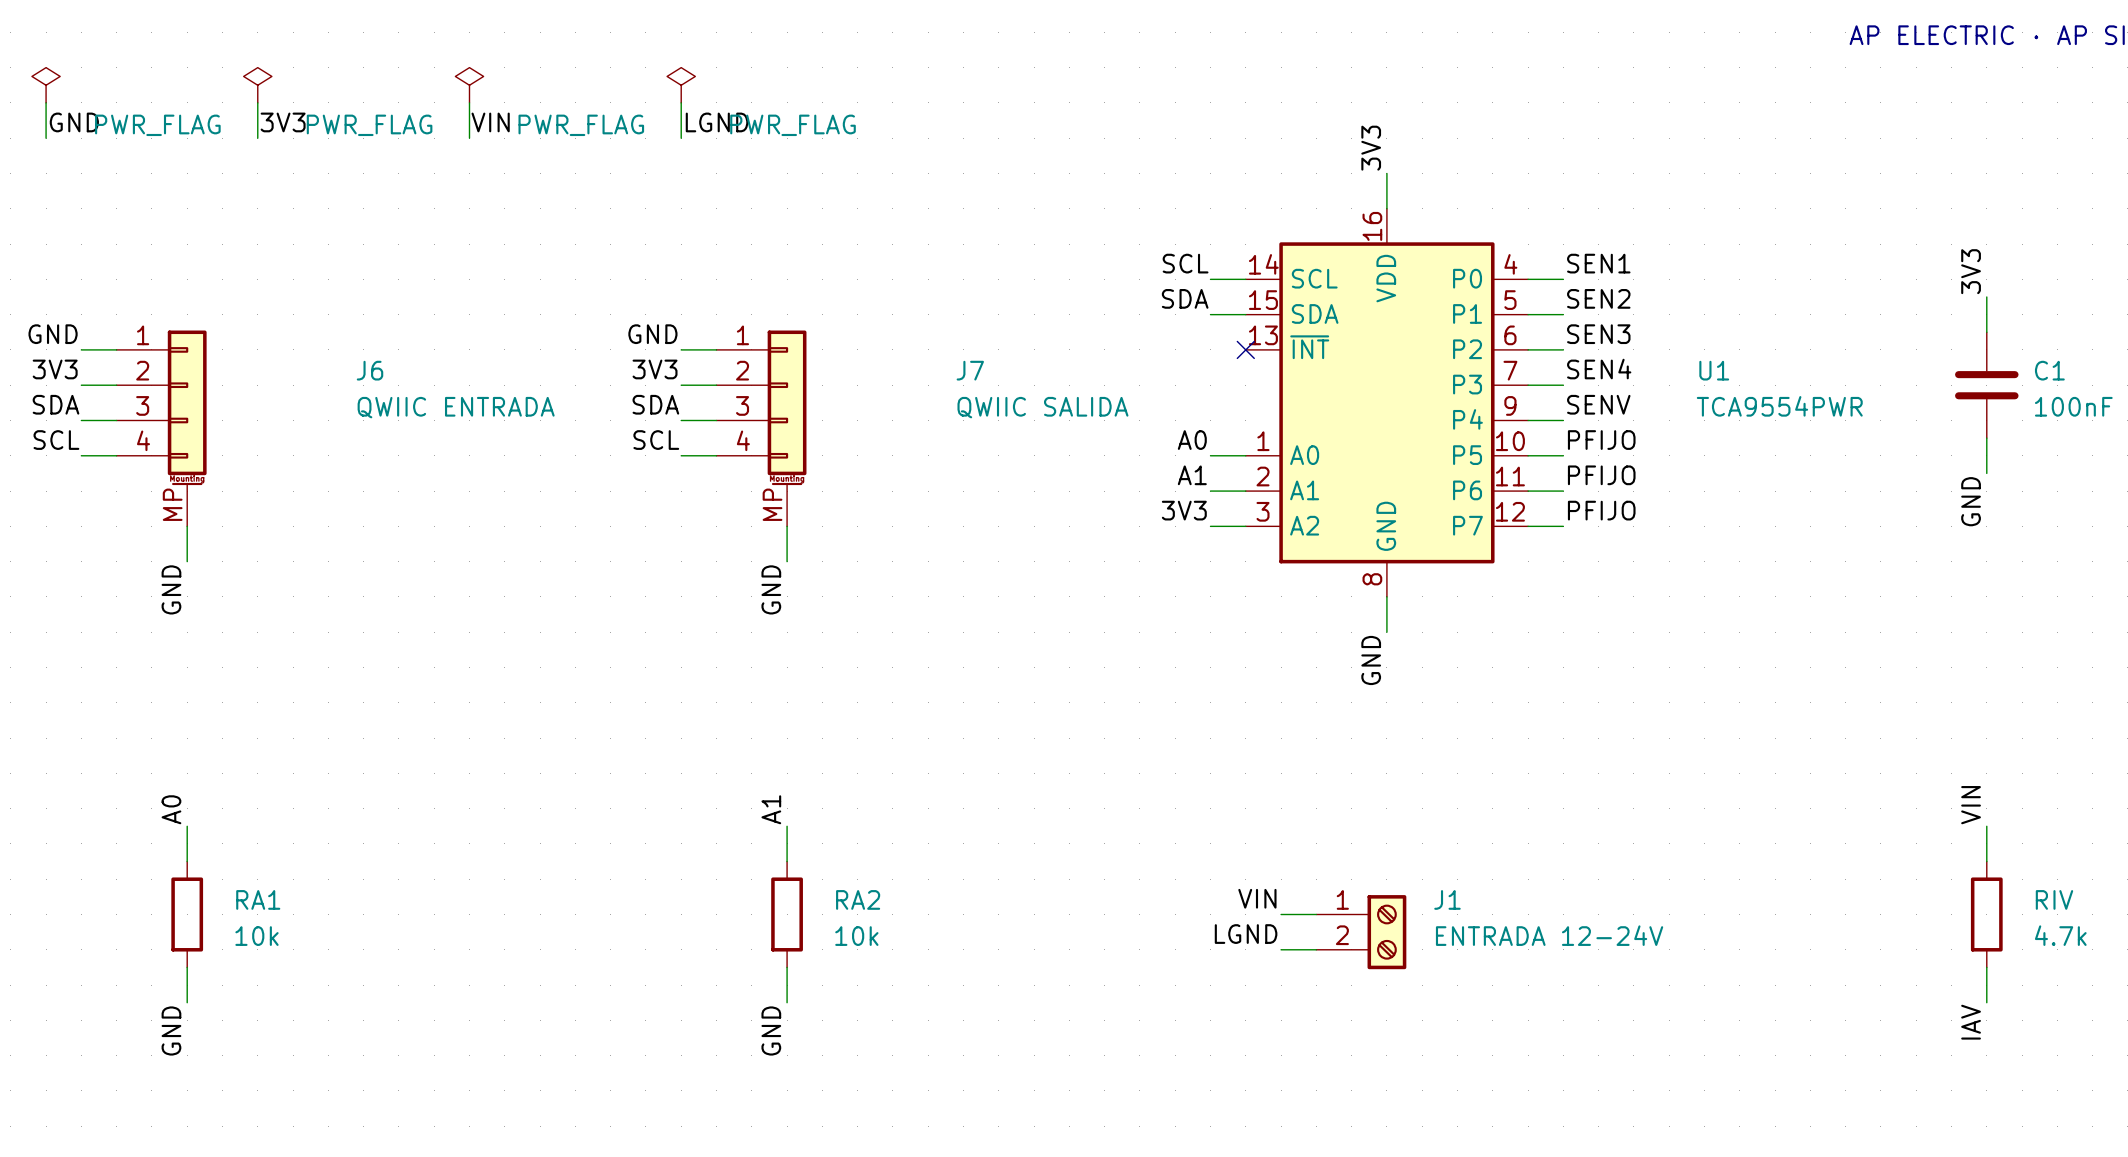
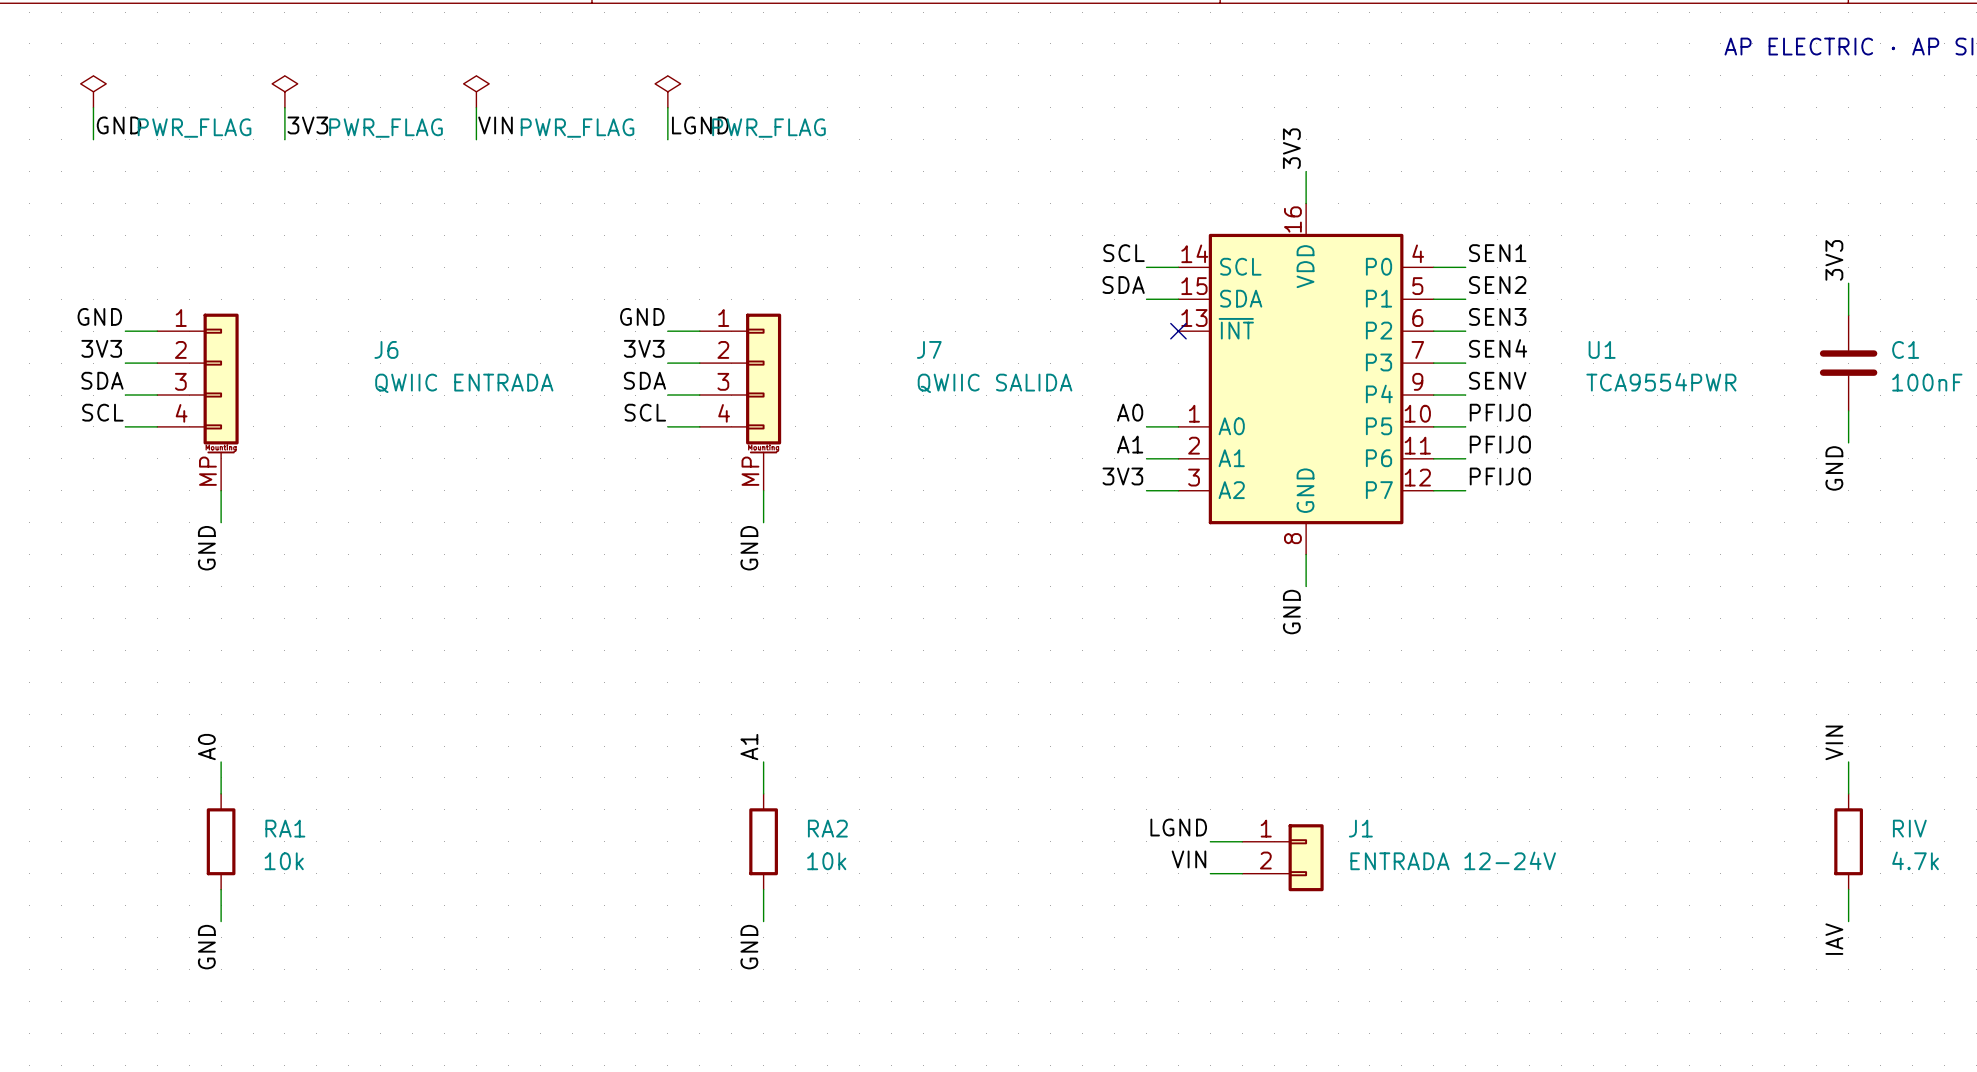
J1 symbol: [1316, 895, 1407, 970] -> [1242, 824, 1324, 892]
label: VIN (1257, 898) -> LGND (1178, 827)
label: LGND (1246, 934) -> VIN (1188, 859)

